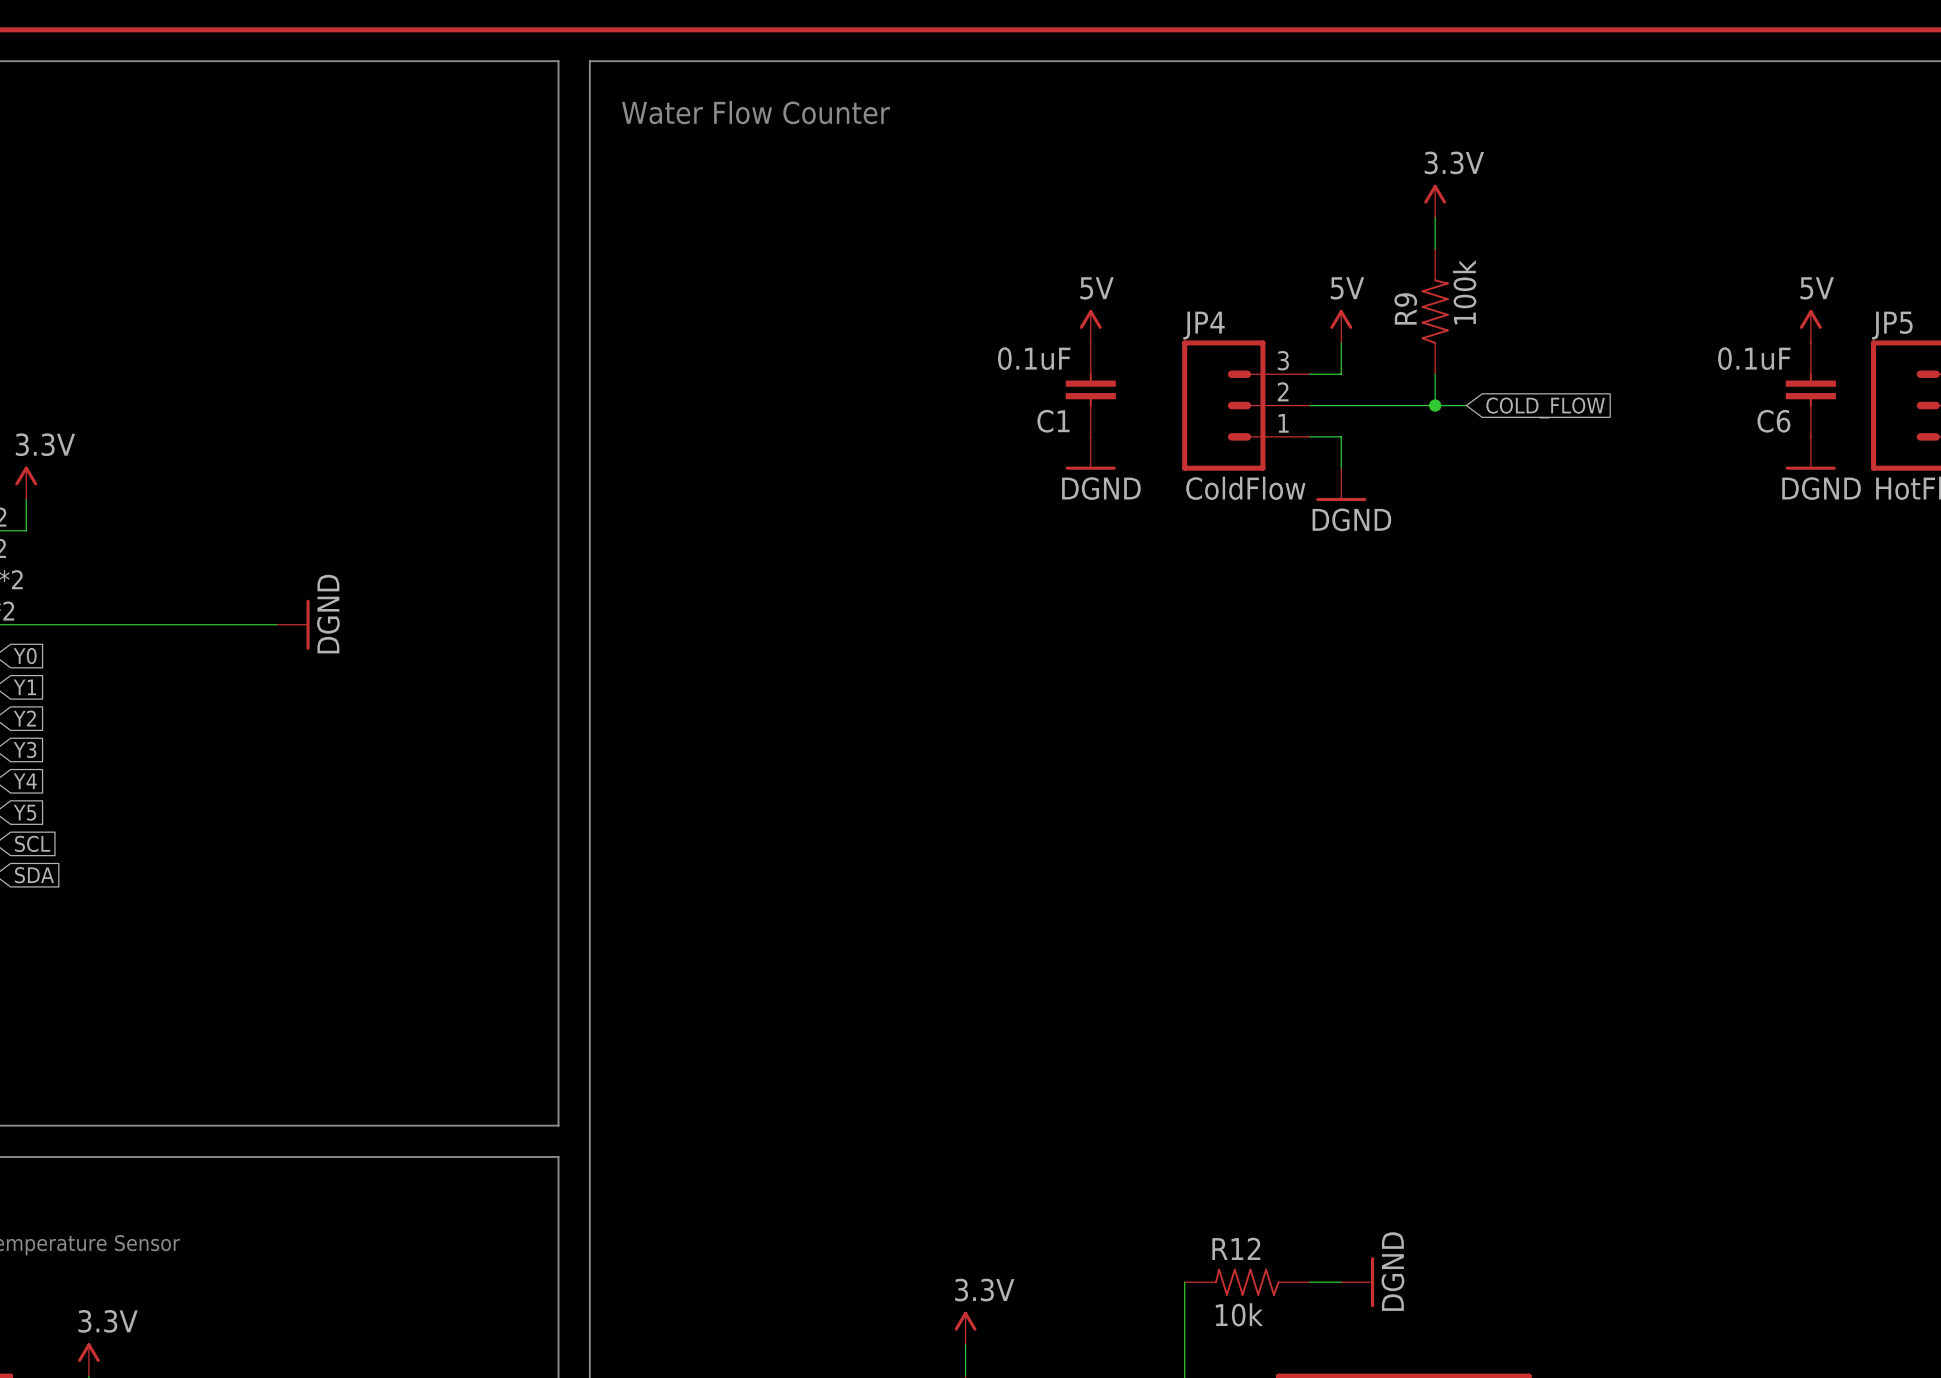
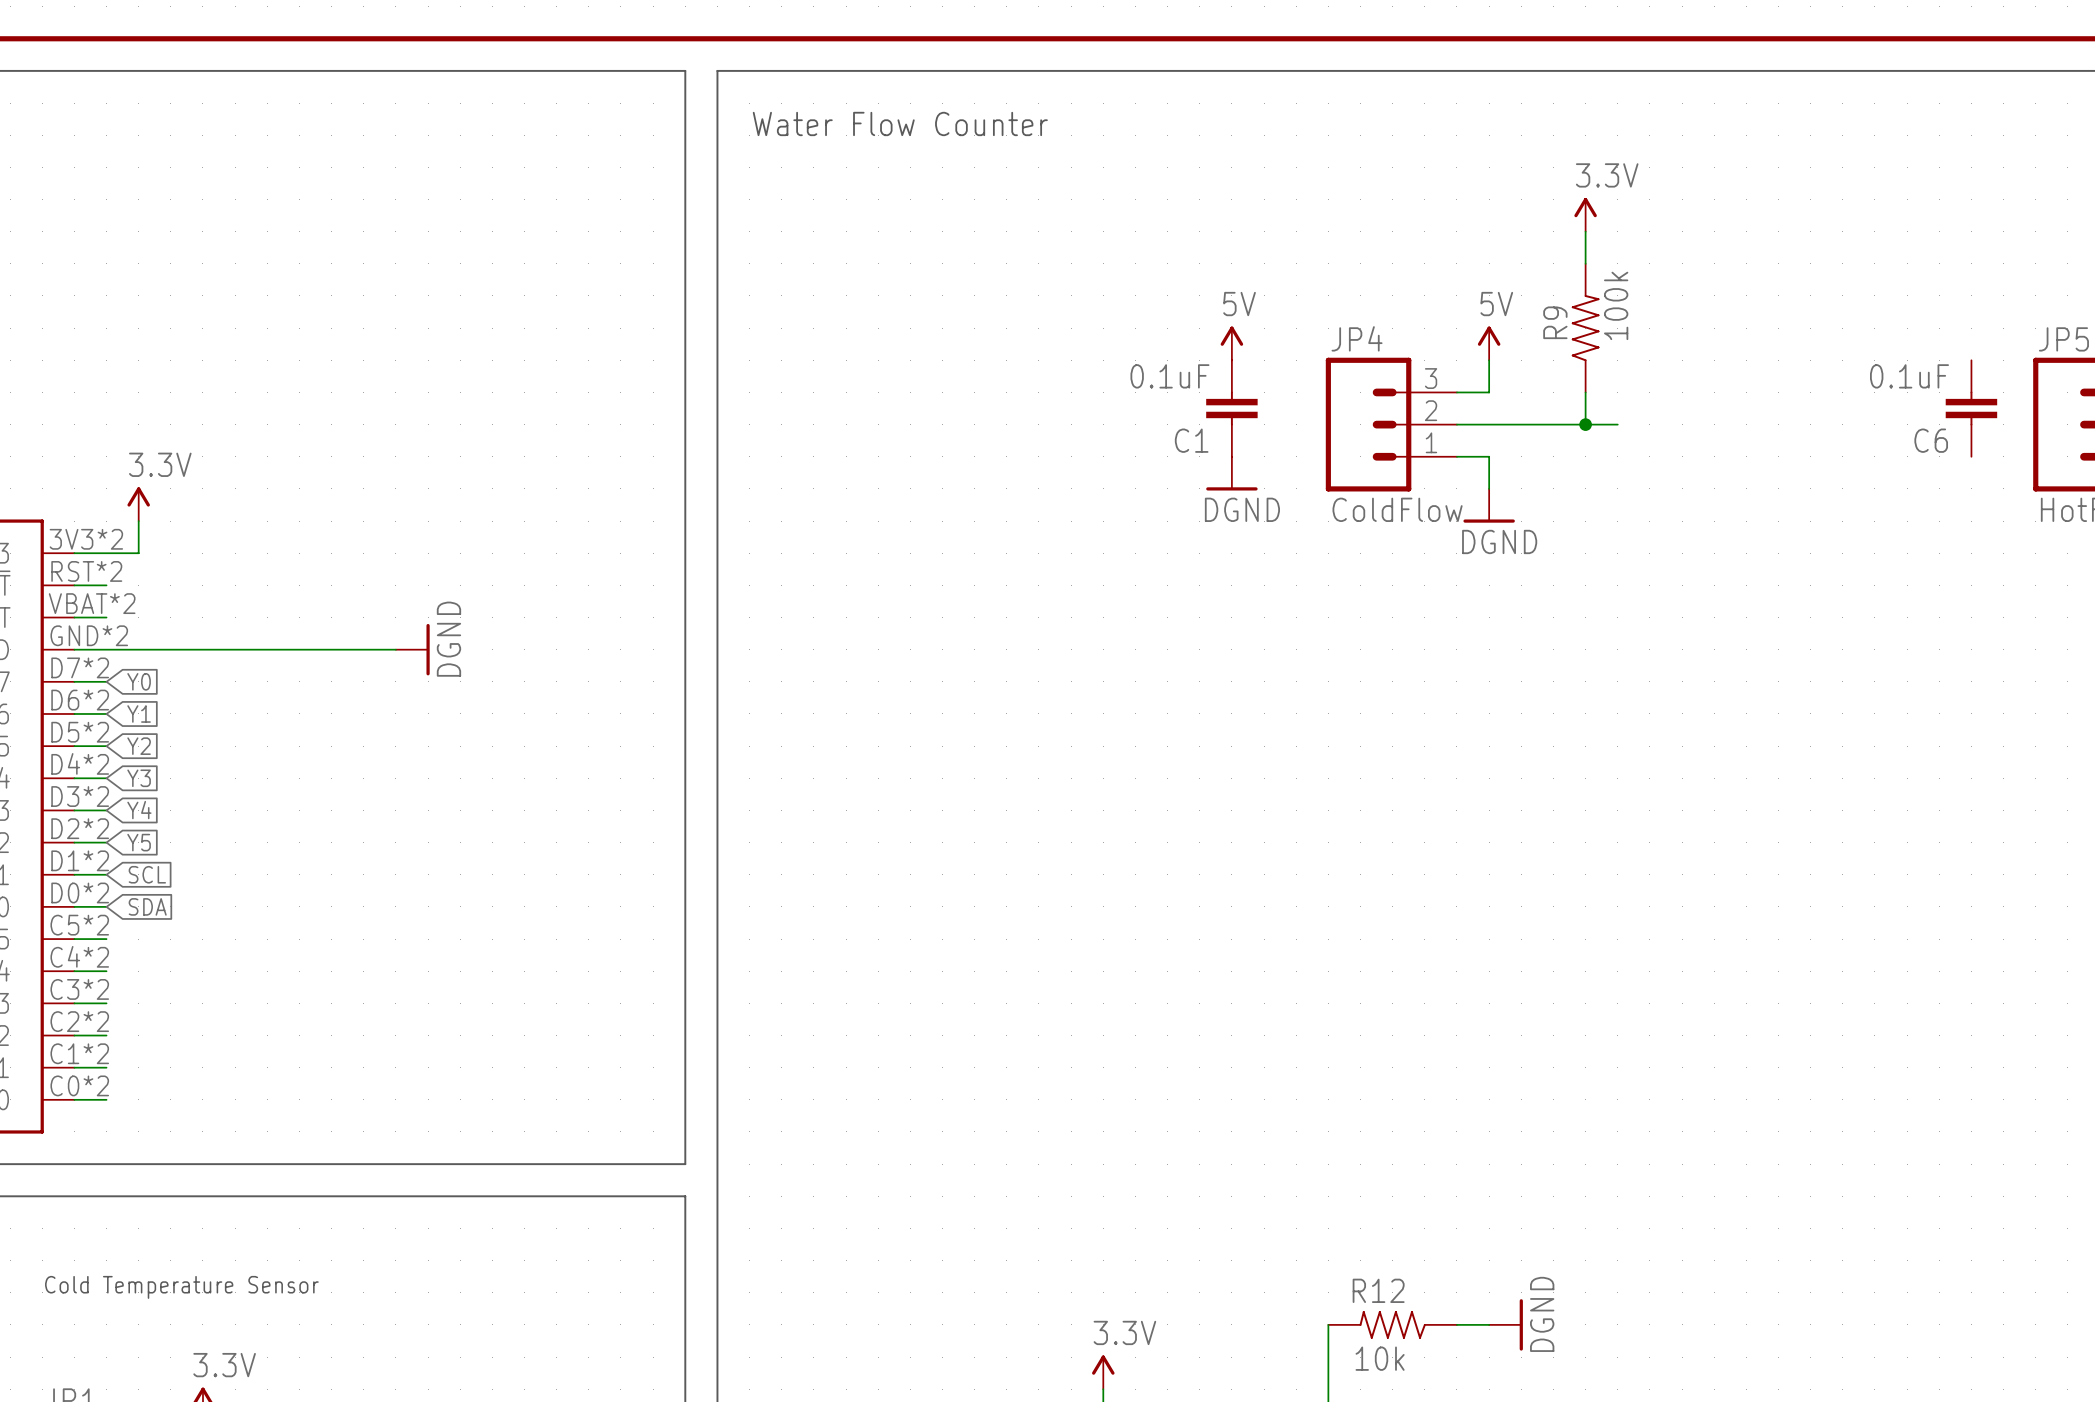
power symbol: 5V (1810, 326) -> none
global label: COLD_FLOW (1545, 407) -> none
power symbol: DGND (1810, 453) -> none

